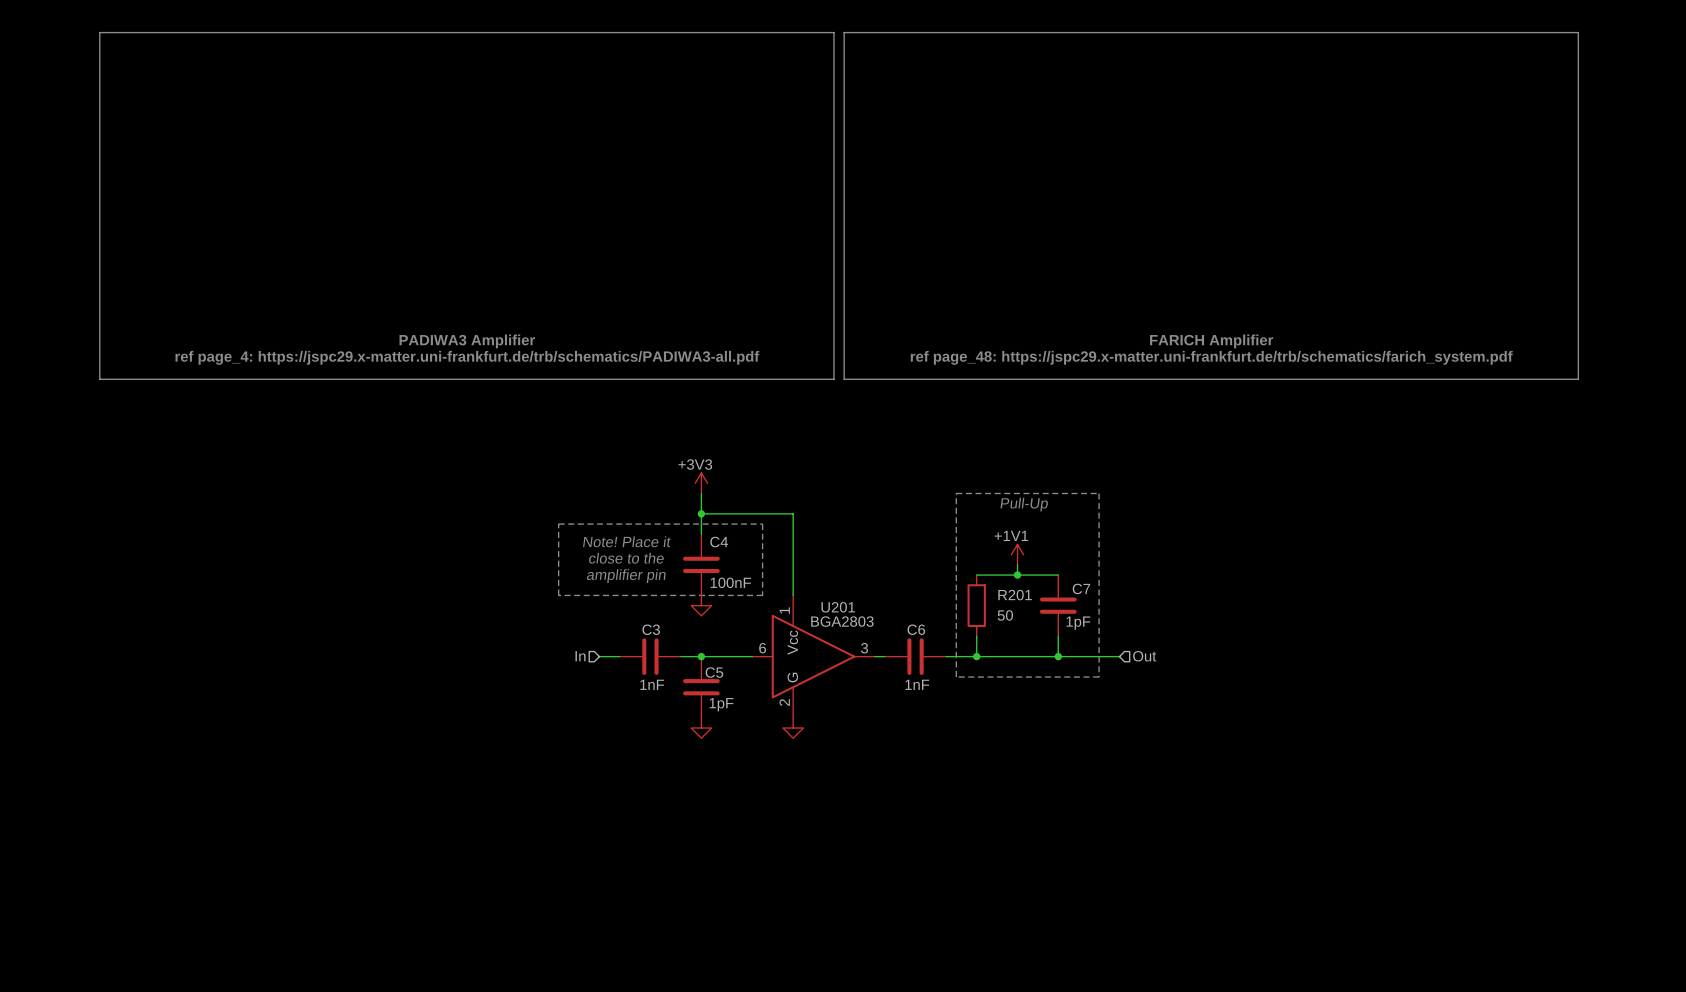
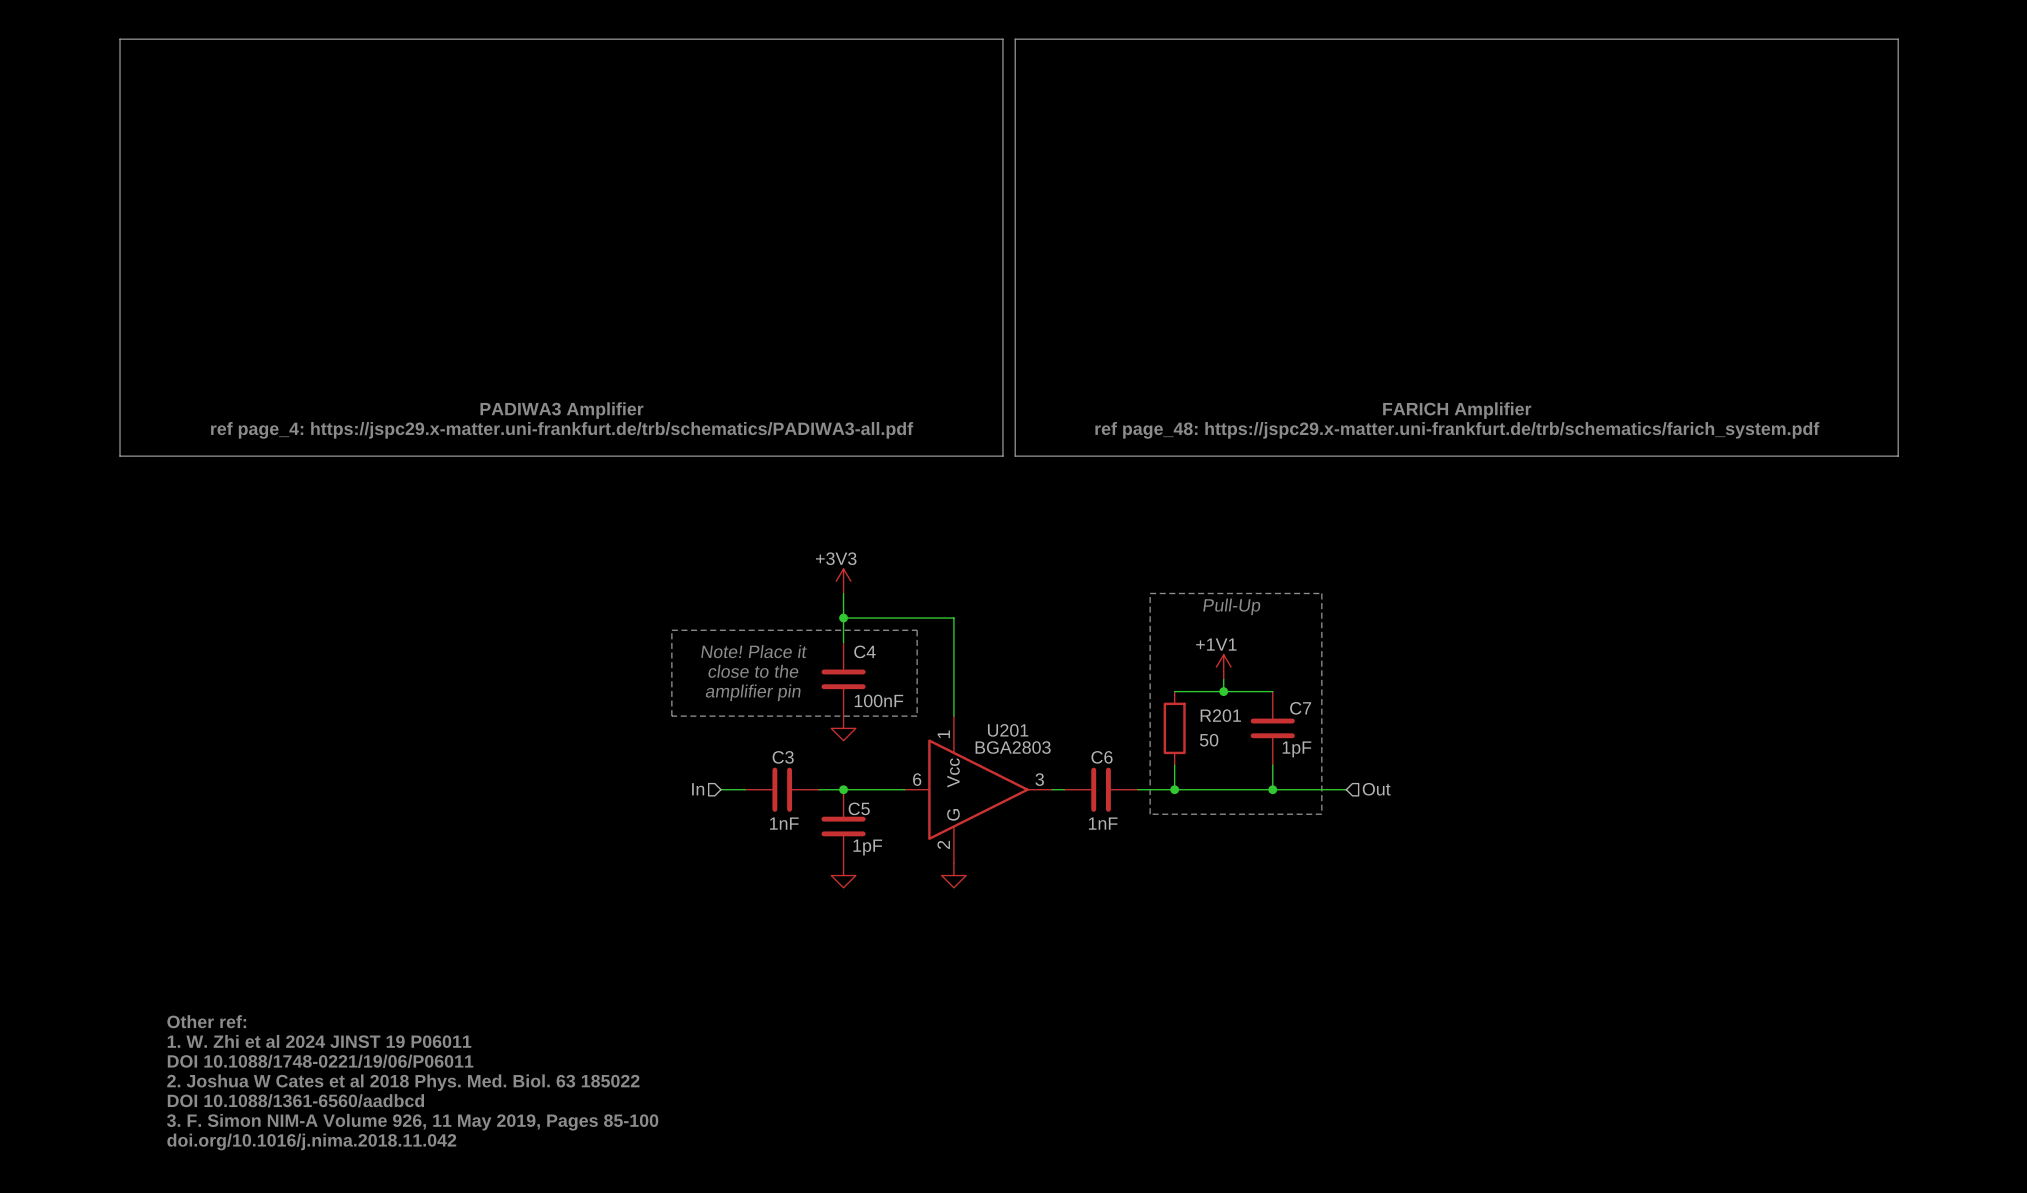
text: none -> Other ref: (206, 1021)
text: none -> 1. W. Zhi et al 2024 JINST 19 P06011 (319, 1041)
text: none -> DOI 10.1088/1748-0221/19/06/P06011 (320, 1061)
text: none -> 2. Joshua W Cates et al 2018 Phys. Med. Biol. 63 185022 (403, 1082)
text: none -> DOI 10.1088/1361-6560/aadbcd (295, 1100)
text: none -> 3. F. Simon NIM-A Volume 926, 11 May 2019, Pages 85-100 (412, 1122)
text: none -> doi.org/10.1016/j.nima.2018.11.042 (311, 1141)

